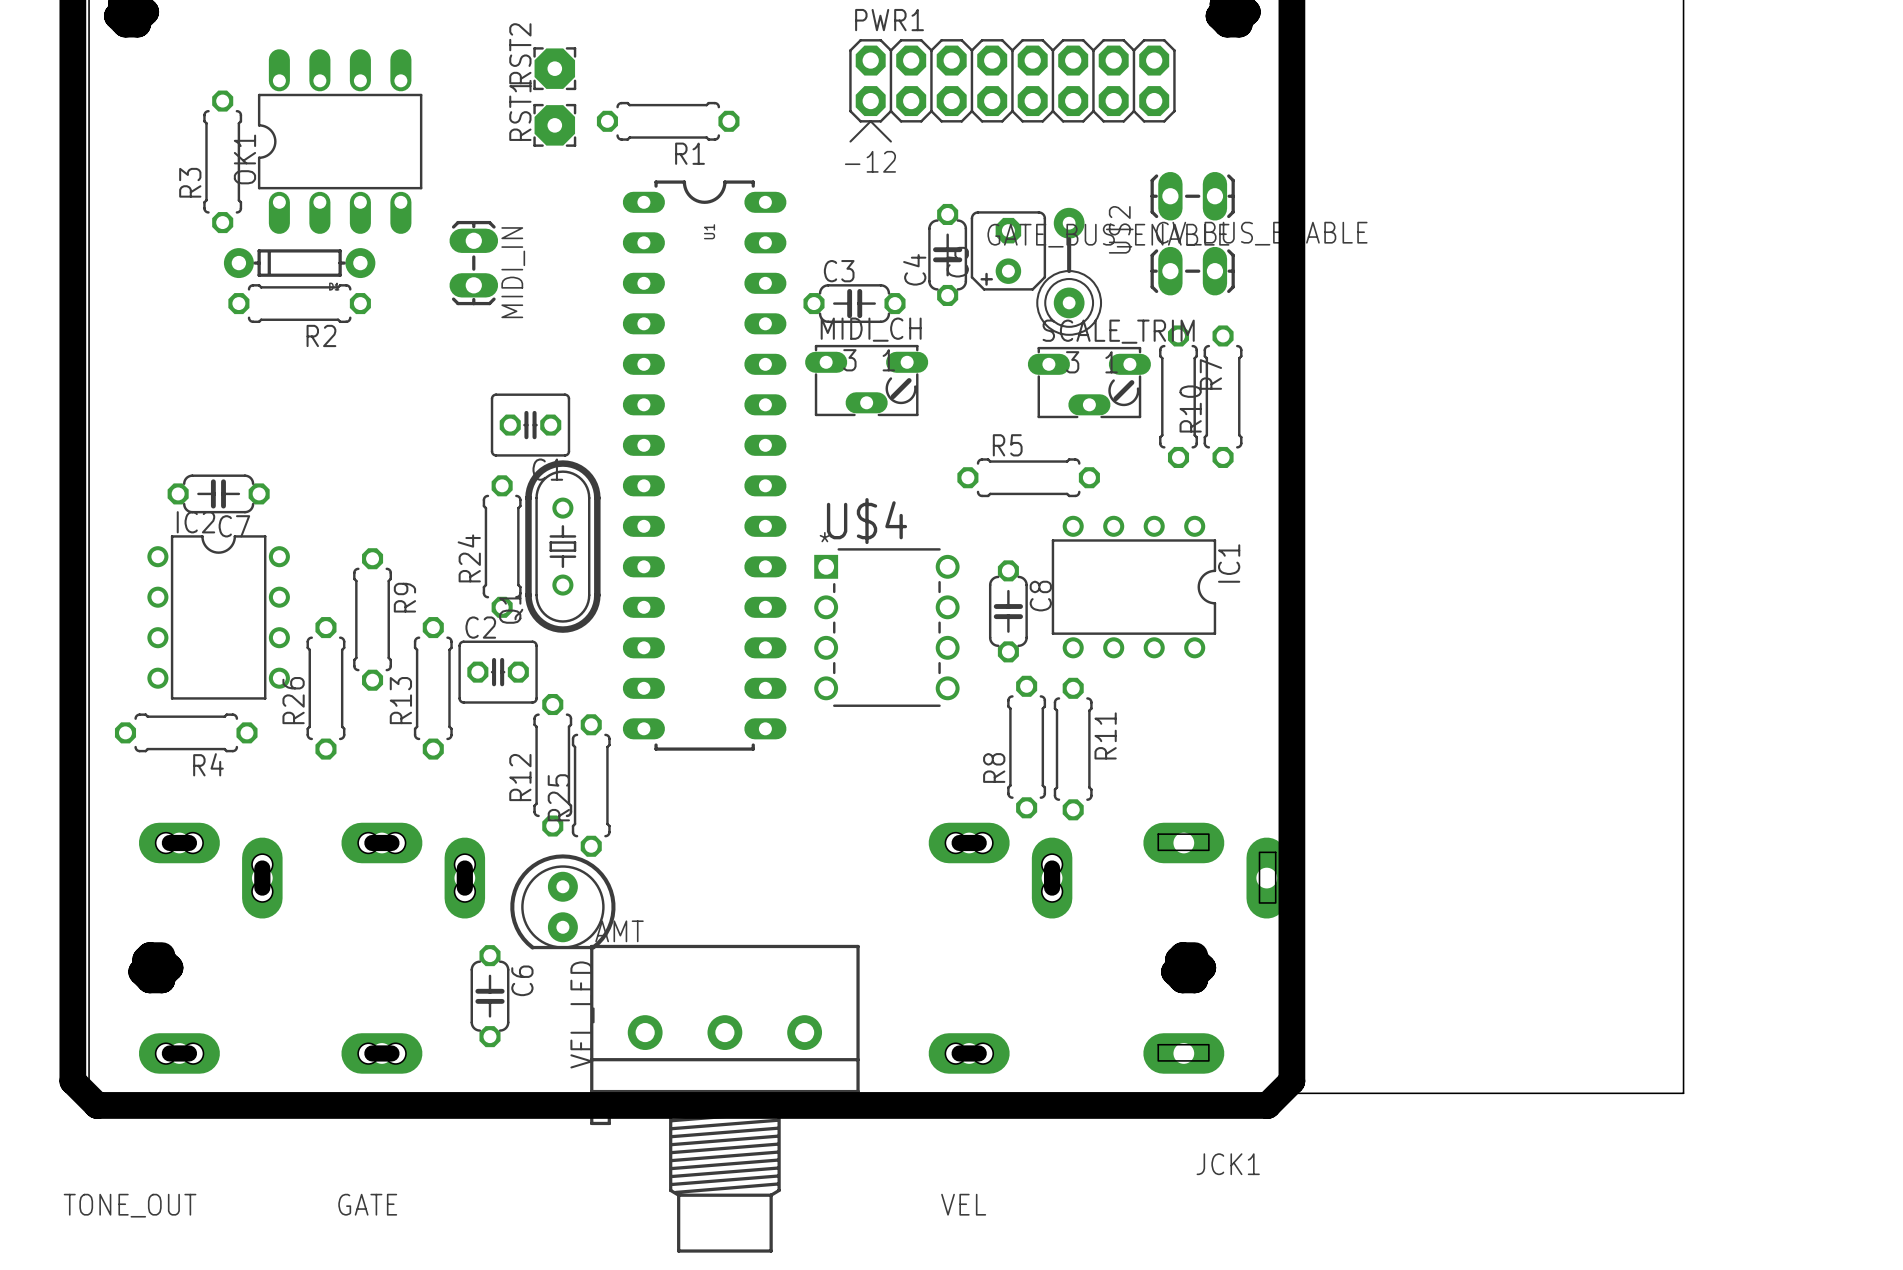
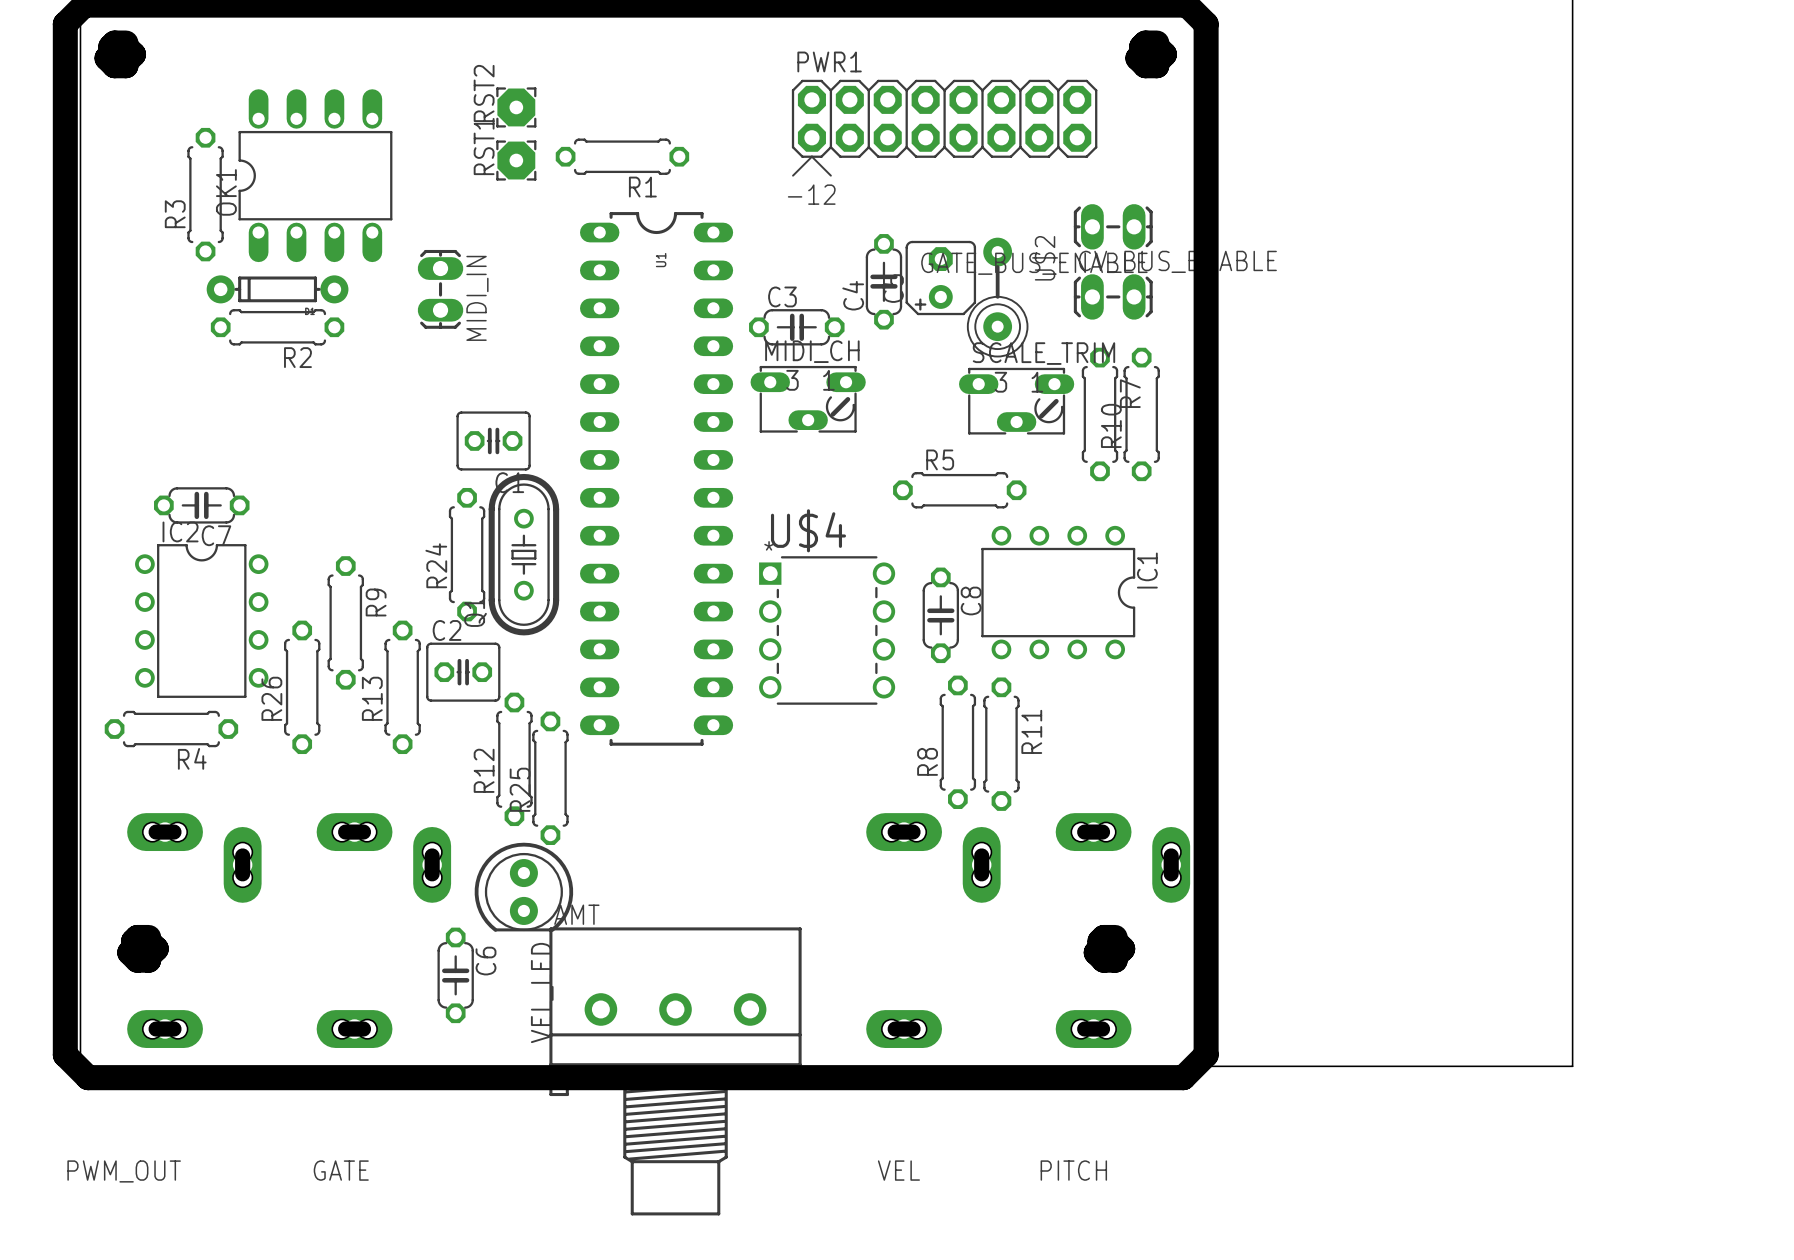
PITCH: none -> (1122, 930)
JCK1: (1215, 948) -> none
TONE_OUT name: TONE_OUT (130, 1205) -> PWM_OUT (124, 1171)

